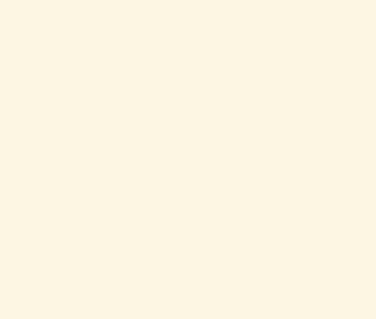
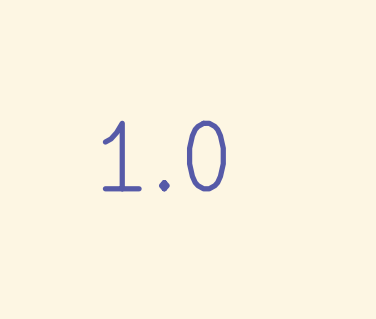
text: none -> 1.0 (164, 156)

